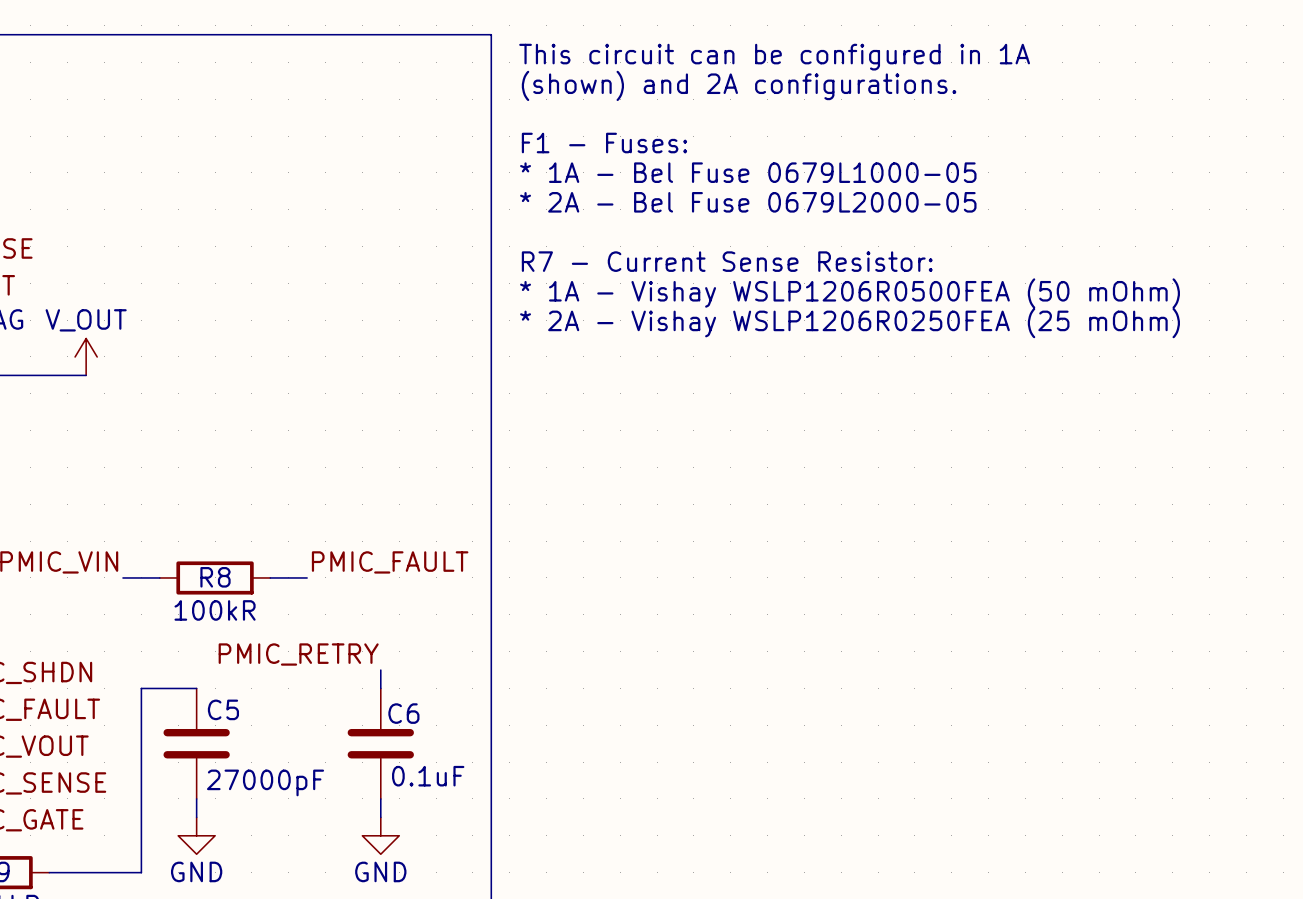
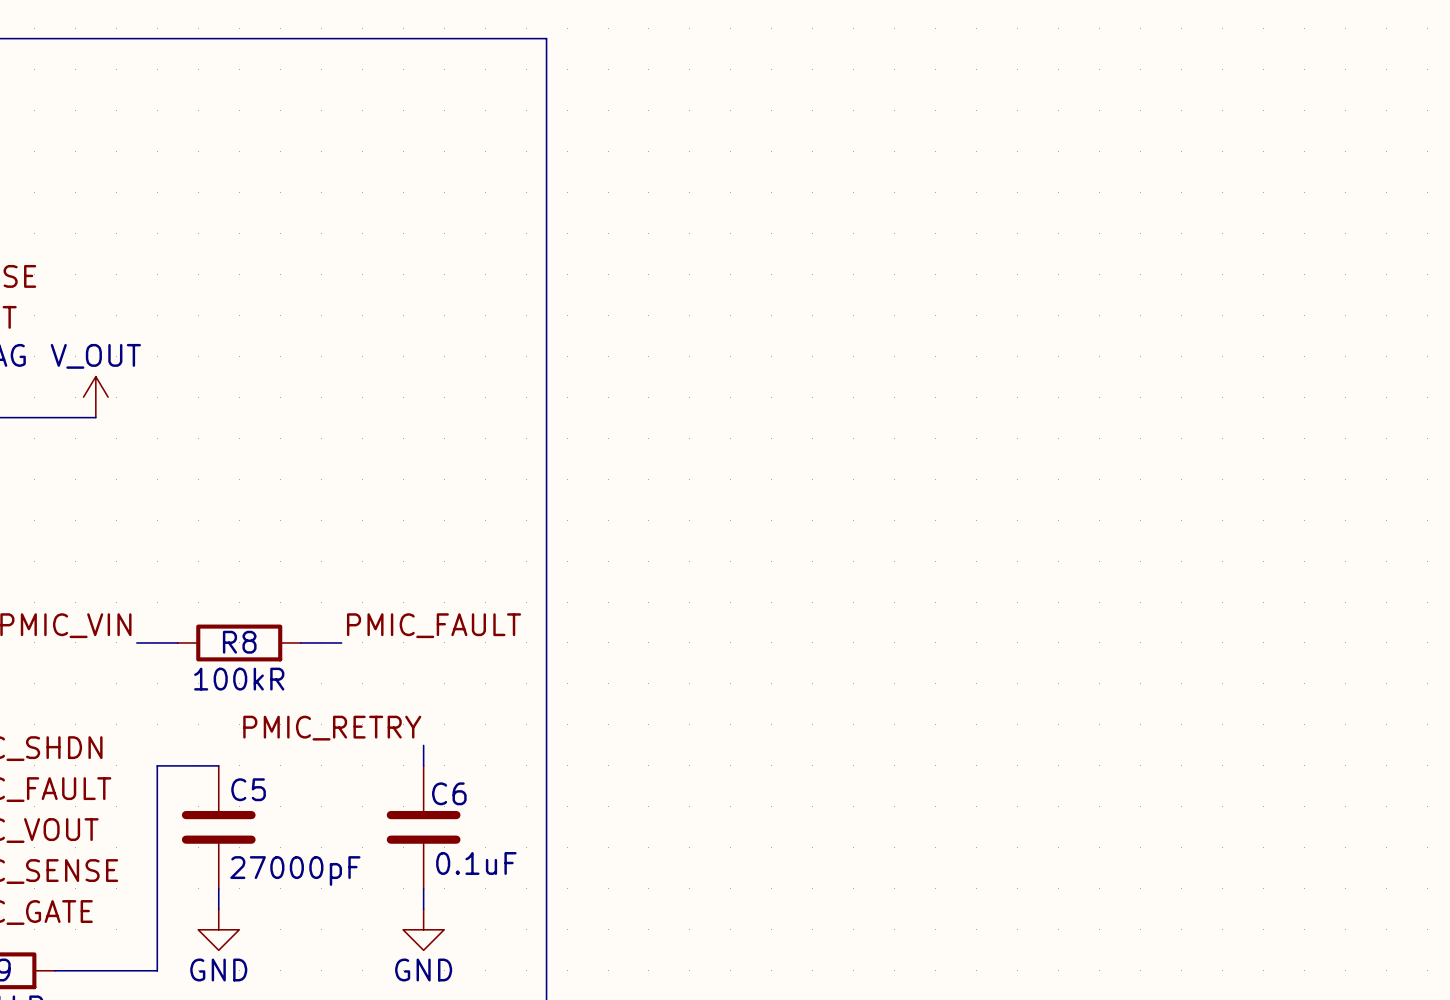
text: This circuit can be configured in 1A (774, 57) -> none
text: (shown) and 2A configurations. (739, 85) -> none
text: F1 - Fuses: (604, 143) -> none
text: * 1A - Bel Fuse 0679L1000-05 (748, 172) -> none
text: * 2A - Bel Fuse 0679L2000-05 (748, 202) -> none
text: R7 - Current Sense Resistor: (727, 261) -> none
text: * 1A - Vishay WSLP1206R0500FEA (50 mOhm) (850, 293) -> none
text: * 2A - Vishay WSLP1206R0250FEA (25 mOhm) (850, 323) -> none

